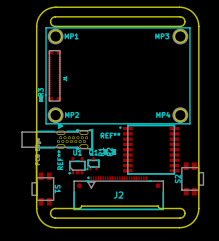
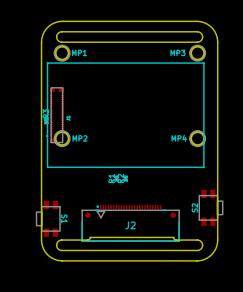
line: (46, 27) (189, 27) (189, 123) (46, 123) (46, 27) -> (47, 63) (203, 63) (203, 167) (47, 167) (47, 63)
part position: (52, 75) -> (55, 115)
part: (149, 149) -> none
part: (57, 153) -> none
part: (92, 163) -> none
part: (76, 165) -> none

